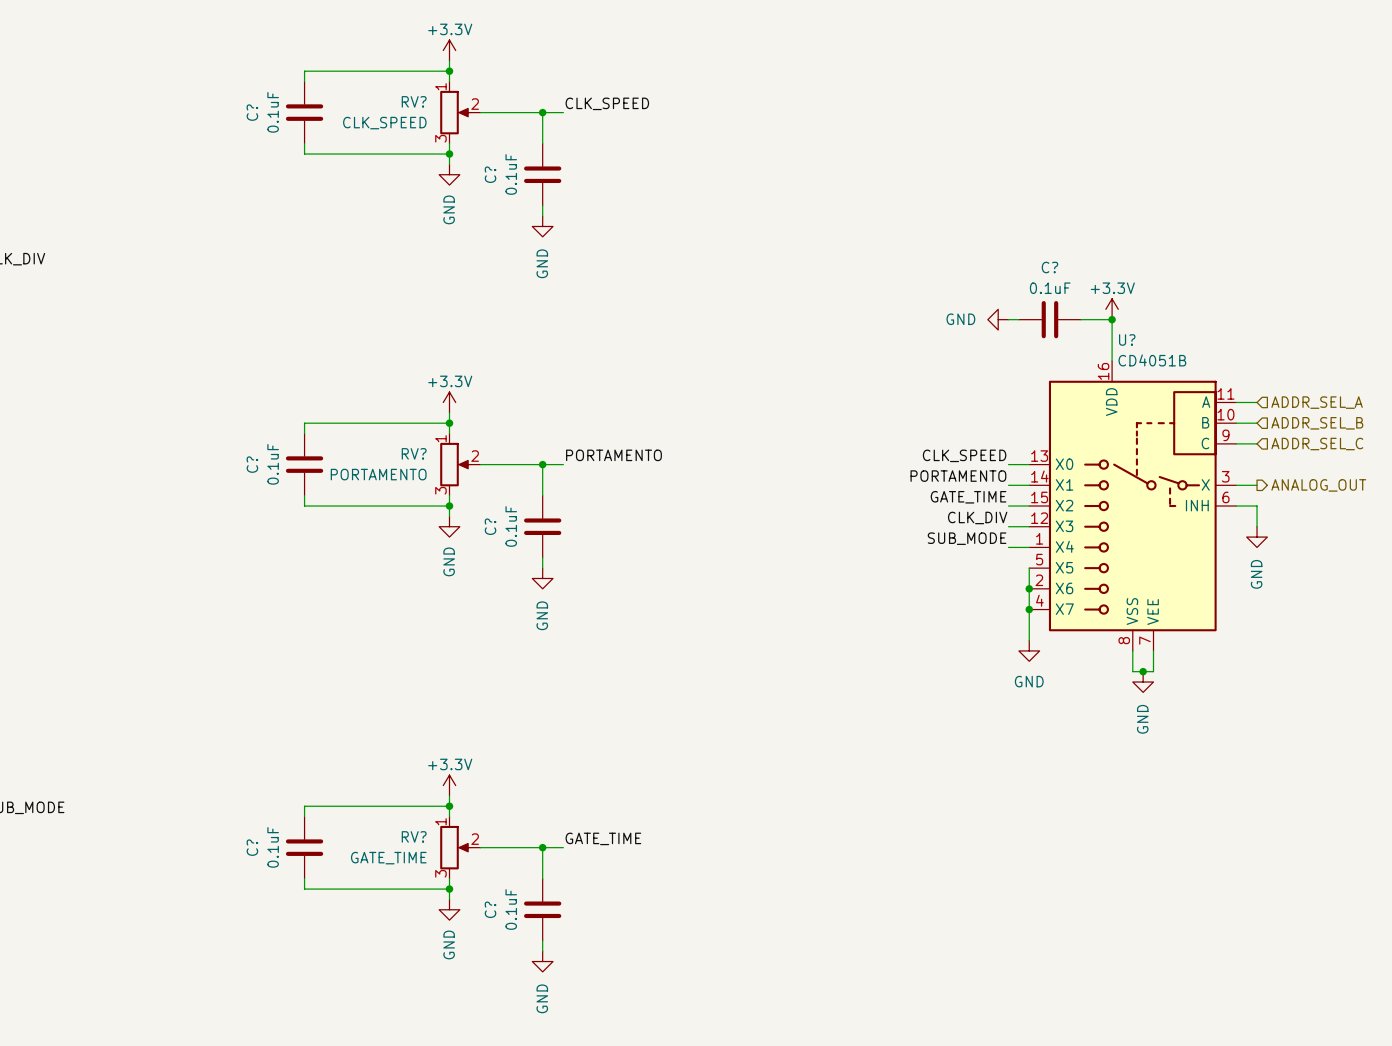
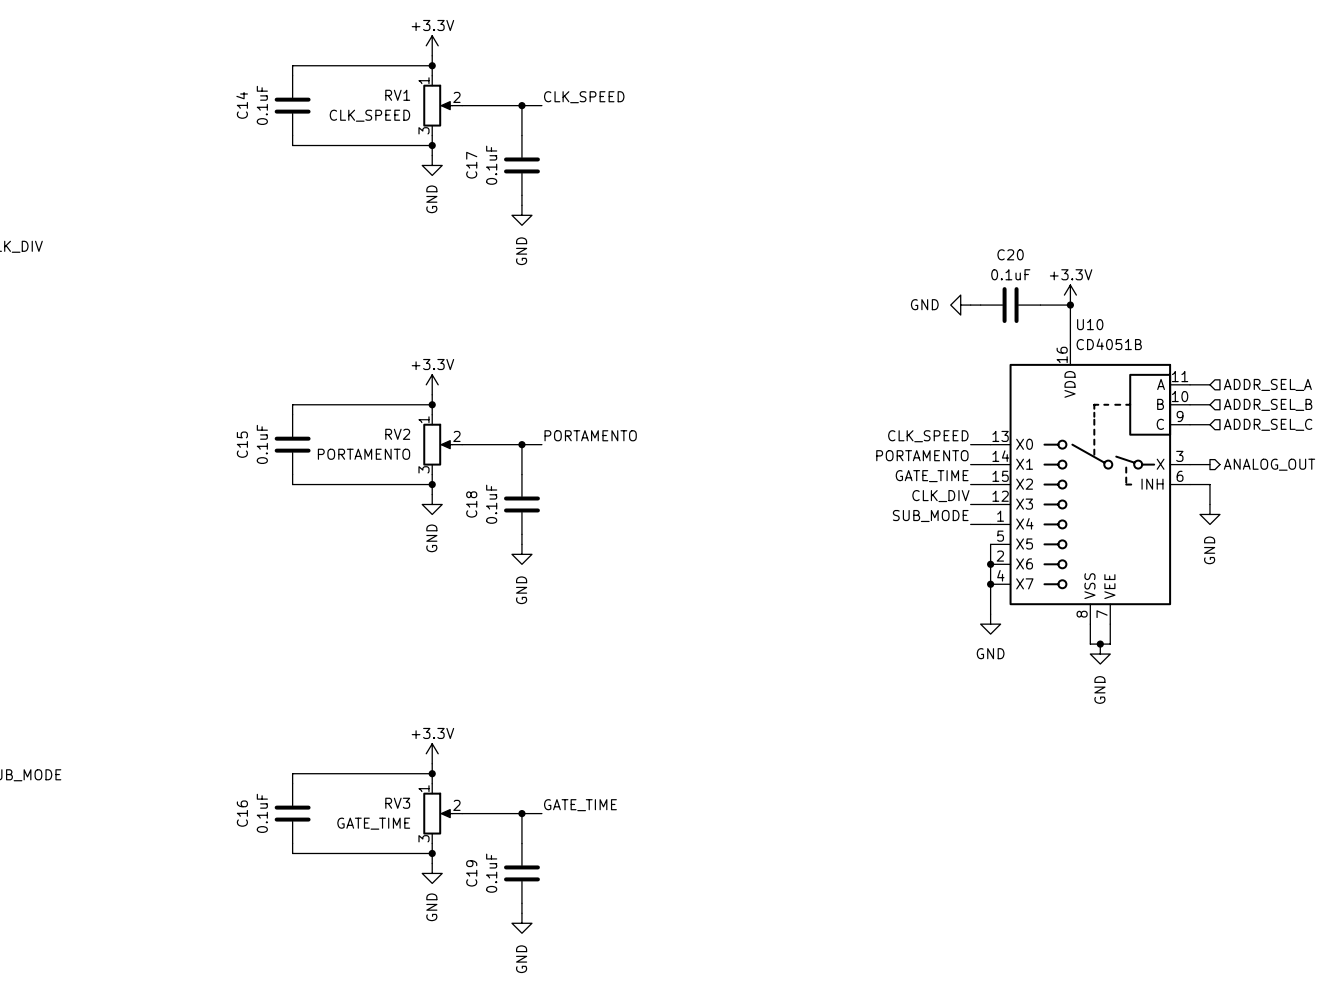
RV? name: RV? (414, 101) -> RV1 (397, 95)
C? name: C? (252, 112) -> C14 (242, 105)
C? name: C? (490, 174) -> C17 (471, 165)
C? name: C? (1049, 267) -> C20 (1010, 254)
U? name: U? (1127, 339) -> U10 (1090, 324)
RV? name: RV? (414, 453) -> RV2 (397, 434)
C? name: C? (252, 464) -> C15 (242, 444)
C? name: C? (490, 526) -> C18 (471, 504)
RV? name: RV? (414, 836) -> RV3 (397, 803)
C? name: C? (252, 847) -> C16 (242, 813)
C? name: C? (490, 909) -> C19 (471, 873)

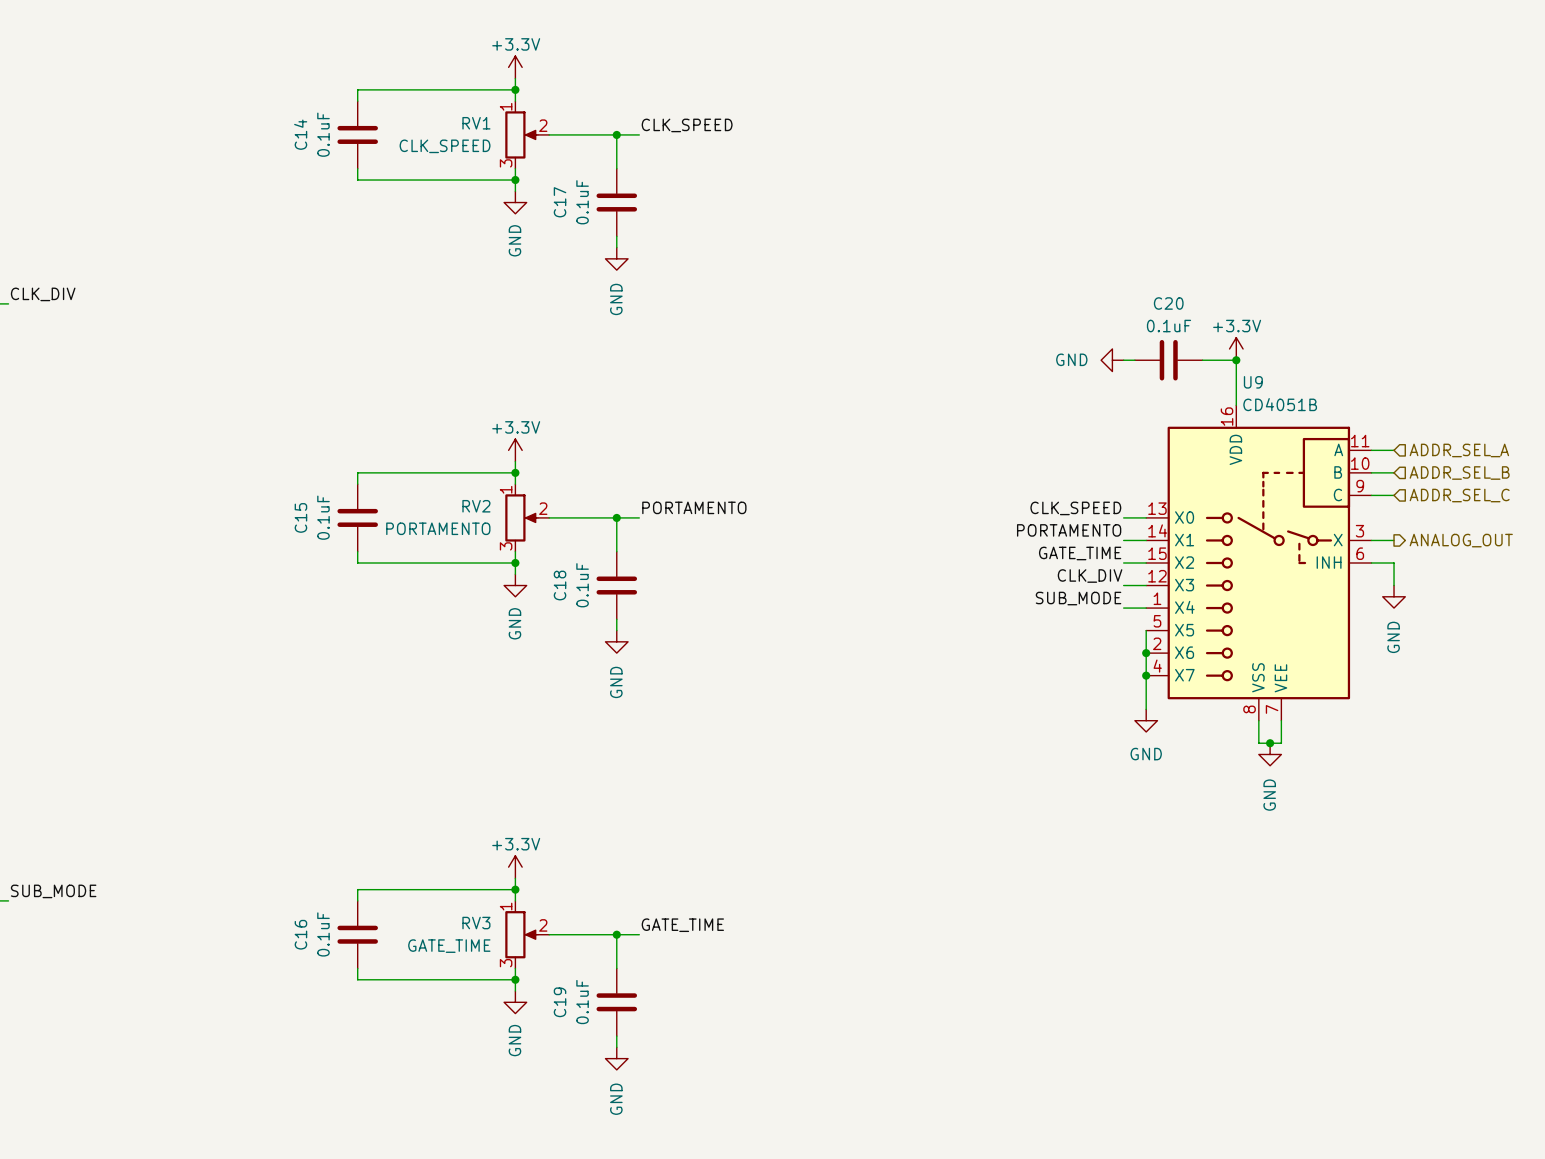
U10 name: U10 (1090, 324) -> U9 (1253, 382)

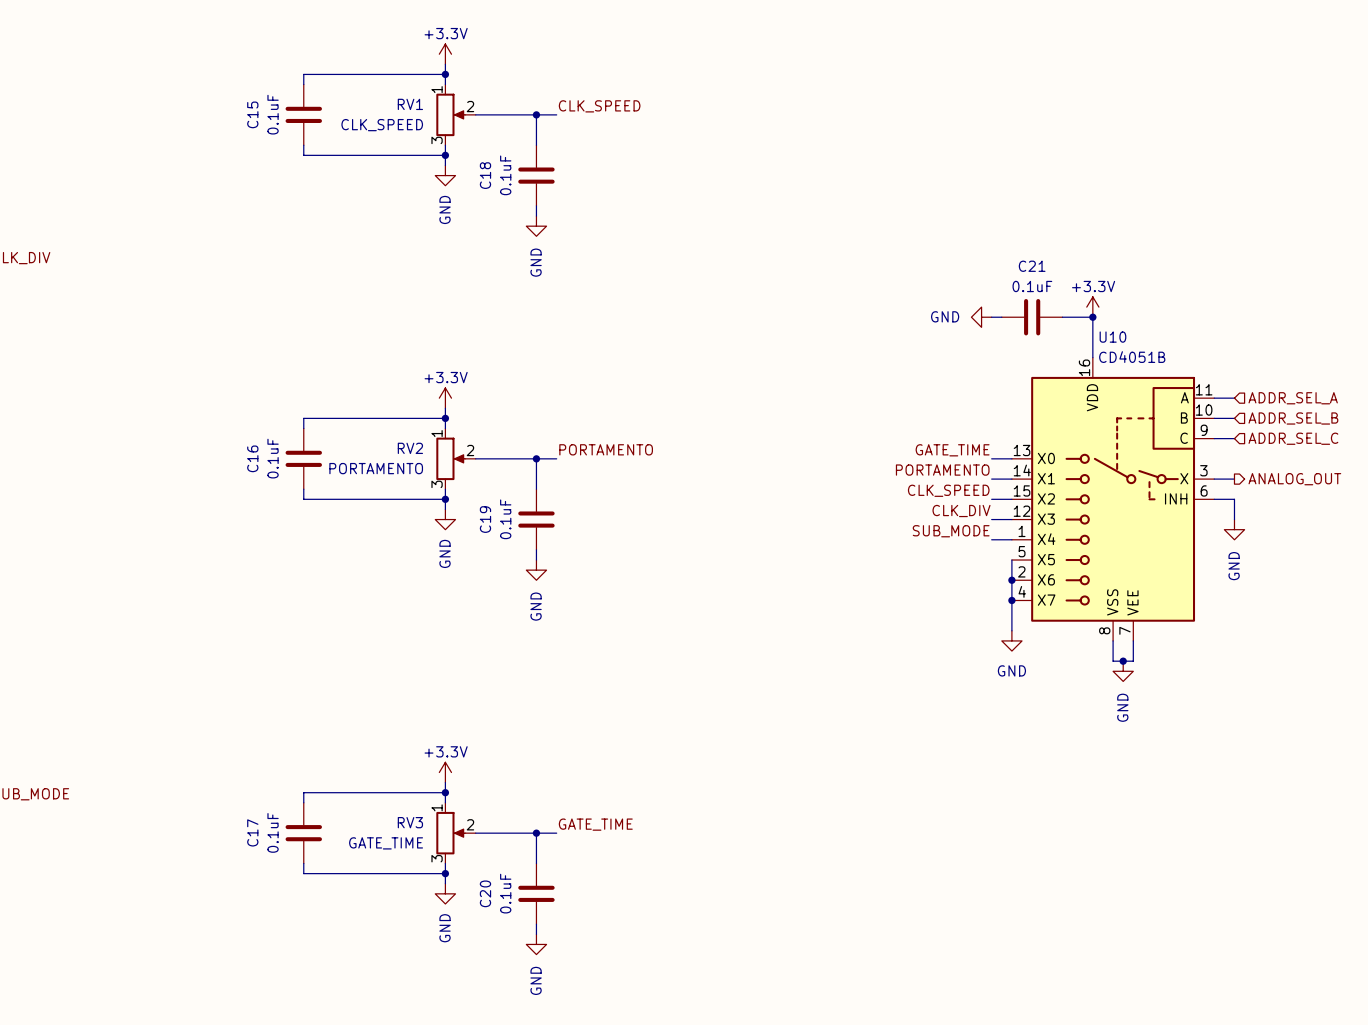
C14 name: C14 (300, 134) -> C15 (252, 114)
C17 name: C17 (560, 202) -> C18 (485, 175)
C20 name: C20 (1168, 303) -> C21 (1032, 266)
U9 name: U9 (1253, 382) -> U10 (1112, 337)
label: CLK_SPEED (1075, 508) -> GATE_TIME (952, 450)
C15 name: C15 (300, 517) -> C16 (252, 458)
label: GATE_TIME (1080, 553) -> CLK_SPEED (948, 490)
C18 name: C18 (560, 585) -> C19 (485, 519)
C16 name: C16 (300, 934) -> C17 (252, 832)
C19 name: C19 (560, 1002) -> C20 (485, 893)

